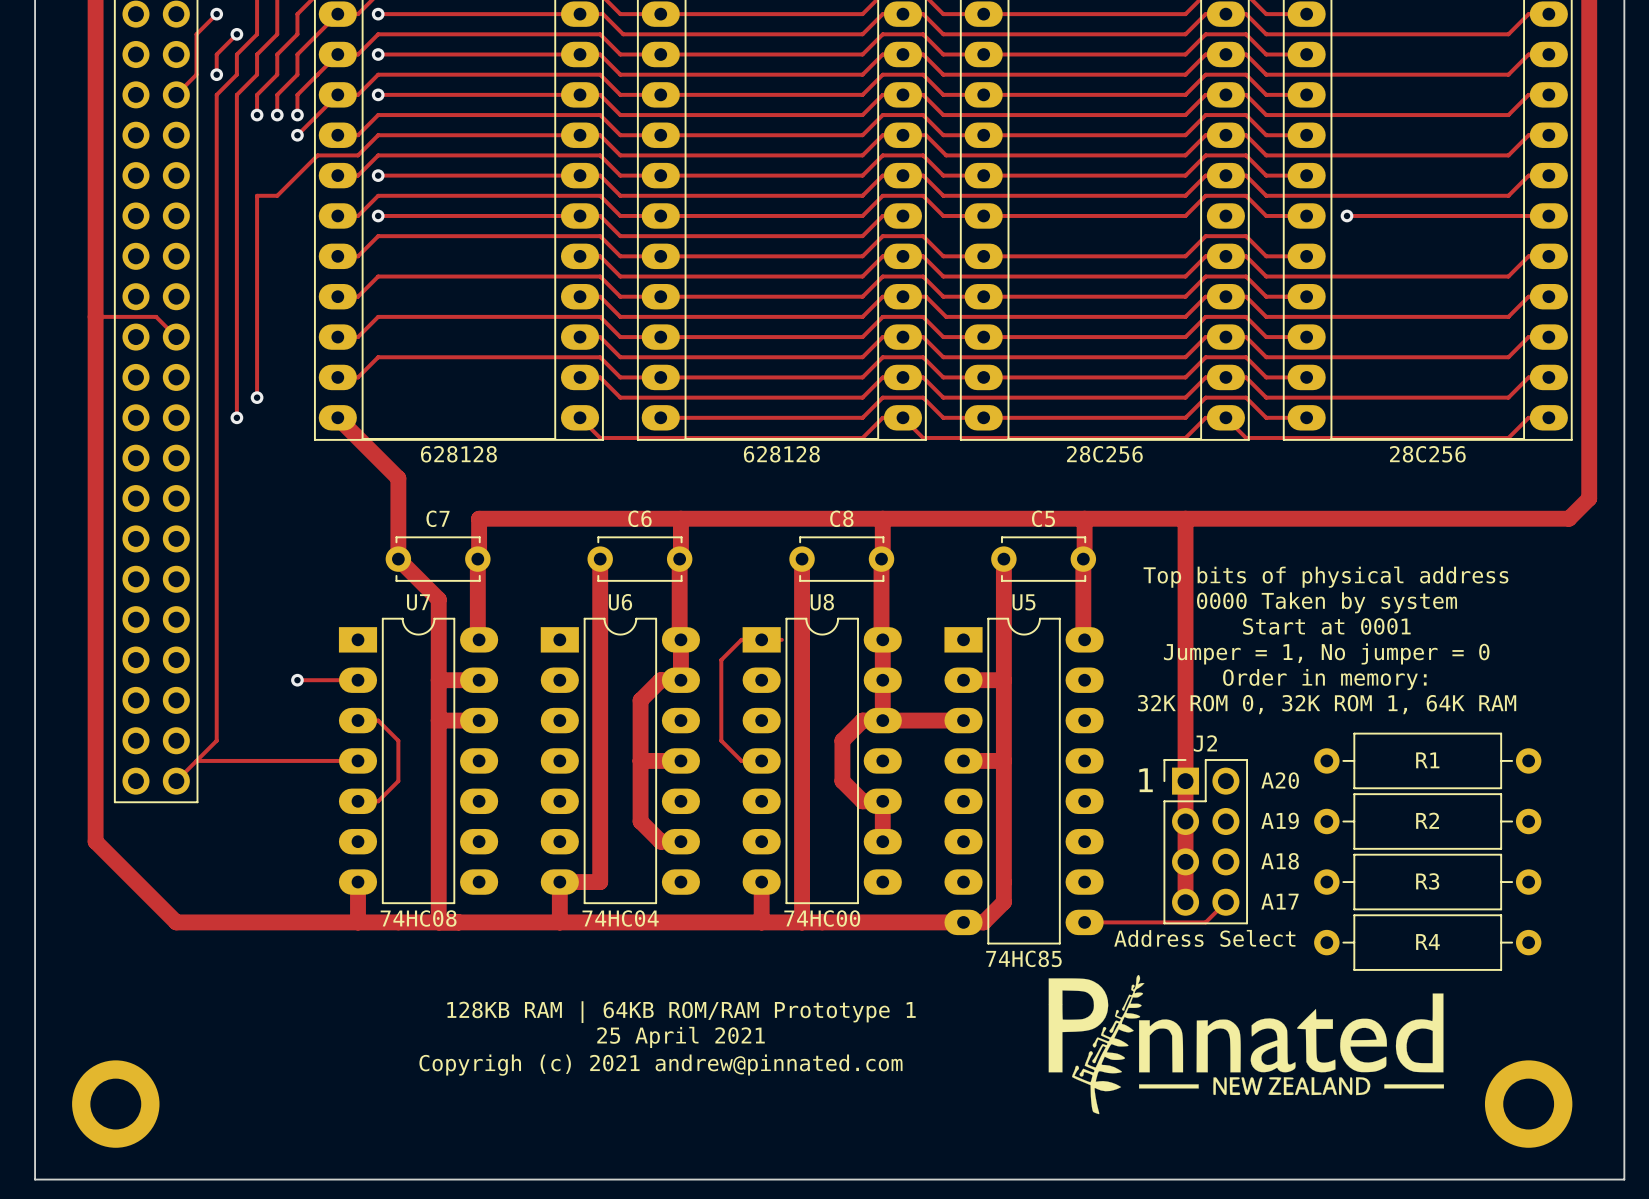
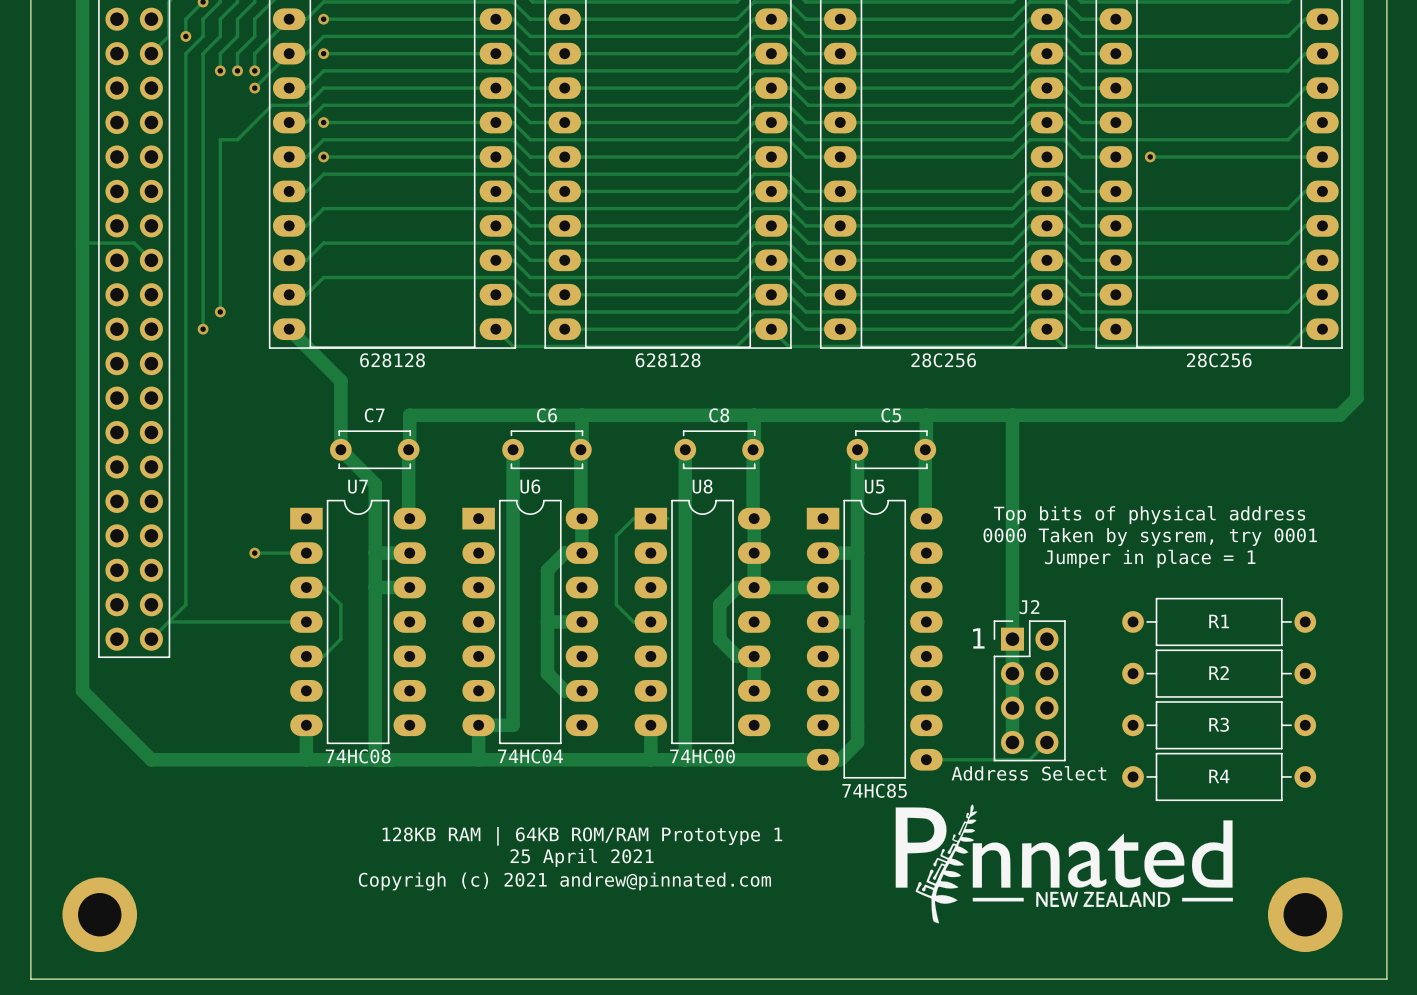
text position: Top bits of physical address (1326, 577) -> Top bits of physical address (1149, 515)
text: 0000 Taken by system (1327, 602) -> none
text: Start at 0001 (1326, 626) -> none
text: Jumper = 1, No jumper = 0 (1326, 653) -> none
text: none -> 0000 Taken by sysrem, try 0001 (1150, 536)
text: Order in memory: (1324, 679) -> none
text: none -> Jumper in place = 1 (1150, 558)
text: 32K ROM 0, 32K ROM 1, 64K RAM (1327, 704) -> none
text: A20 (1280, 780) -> none
text: A19 (1280, 820) -> none
text: A18 (1280, 861) -> none
text: A17 (1279, 901) -> none

